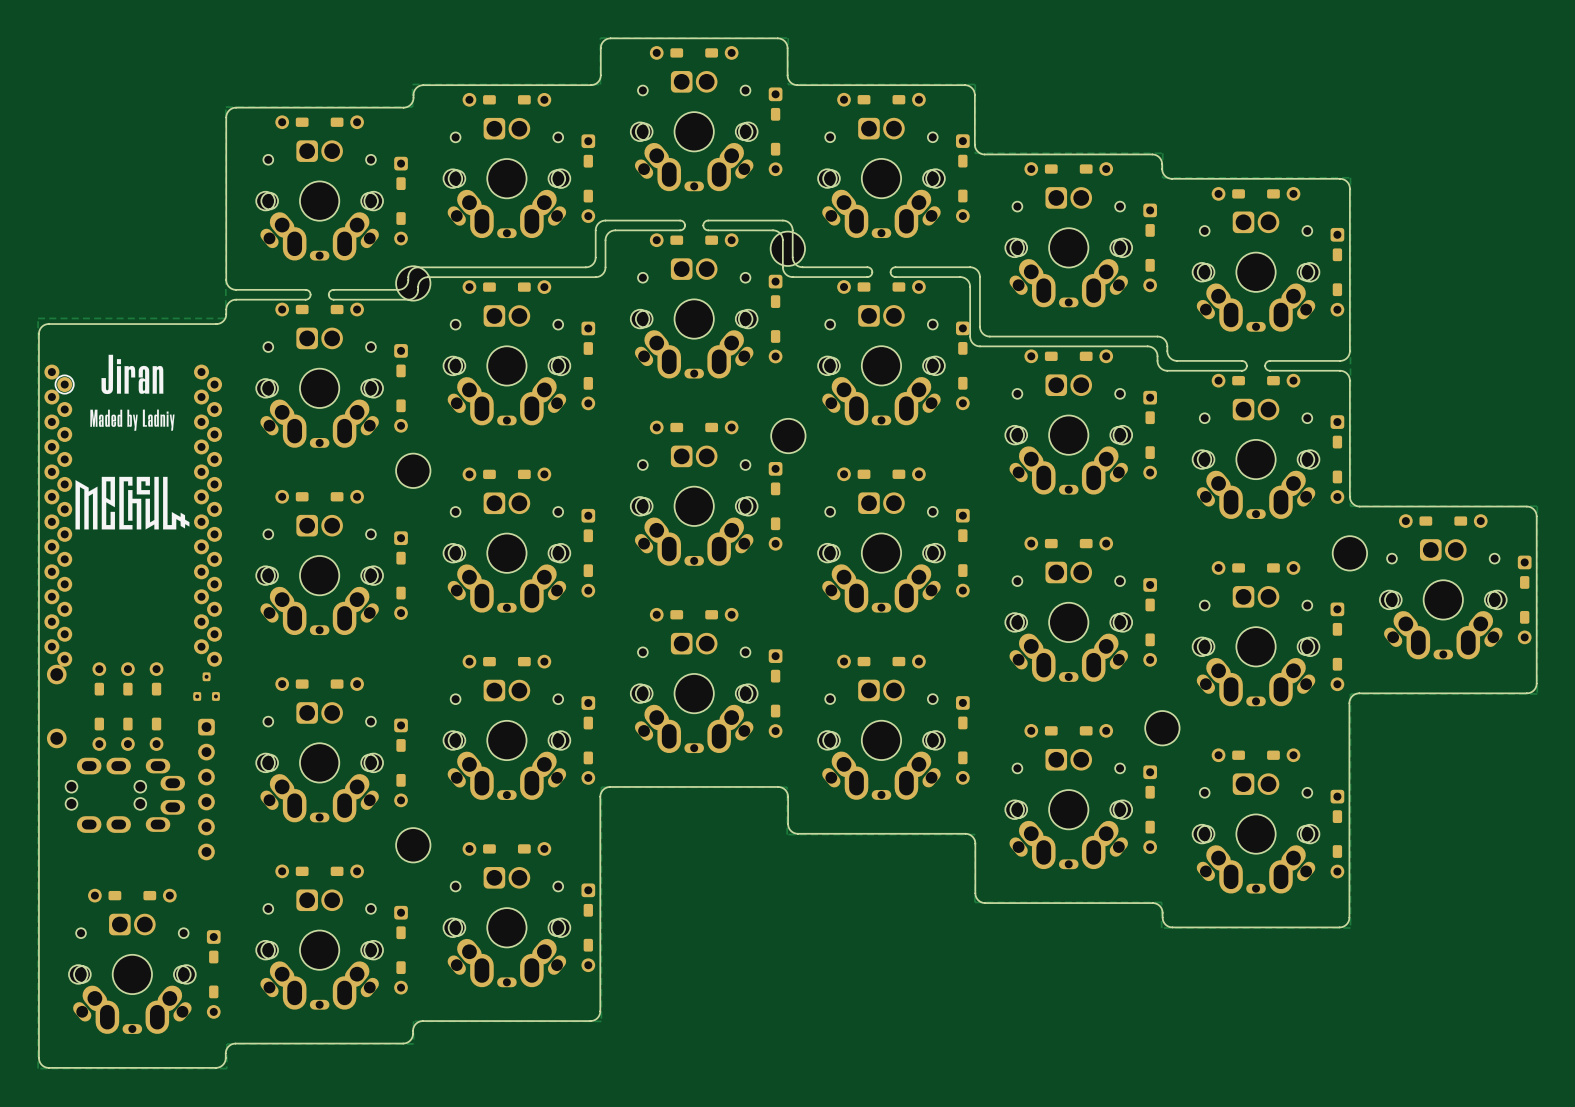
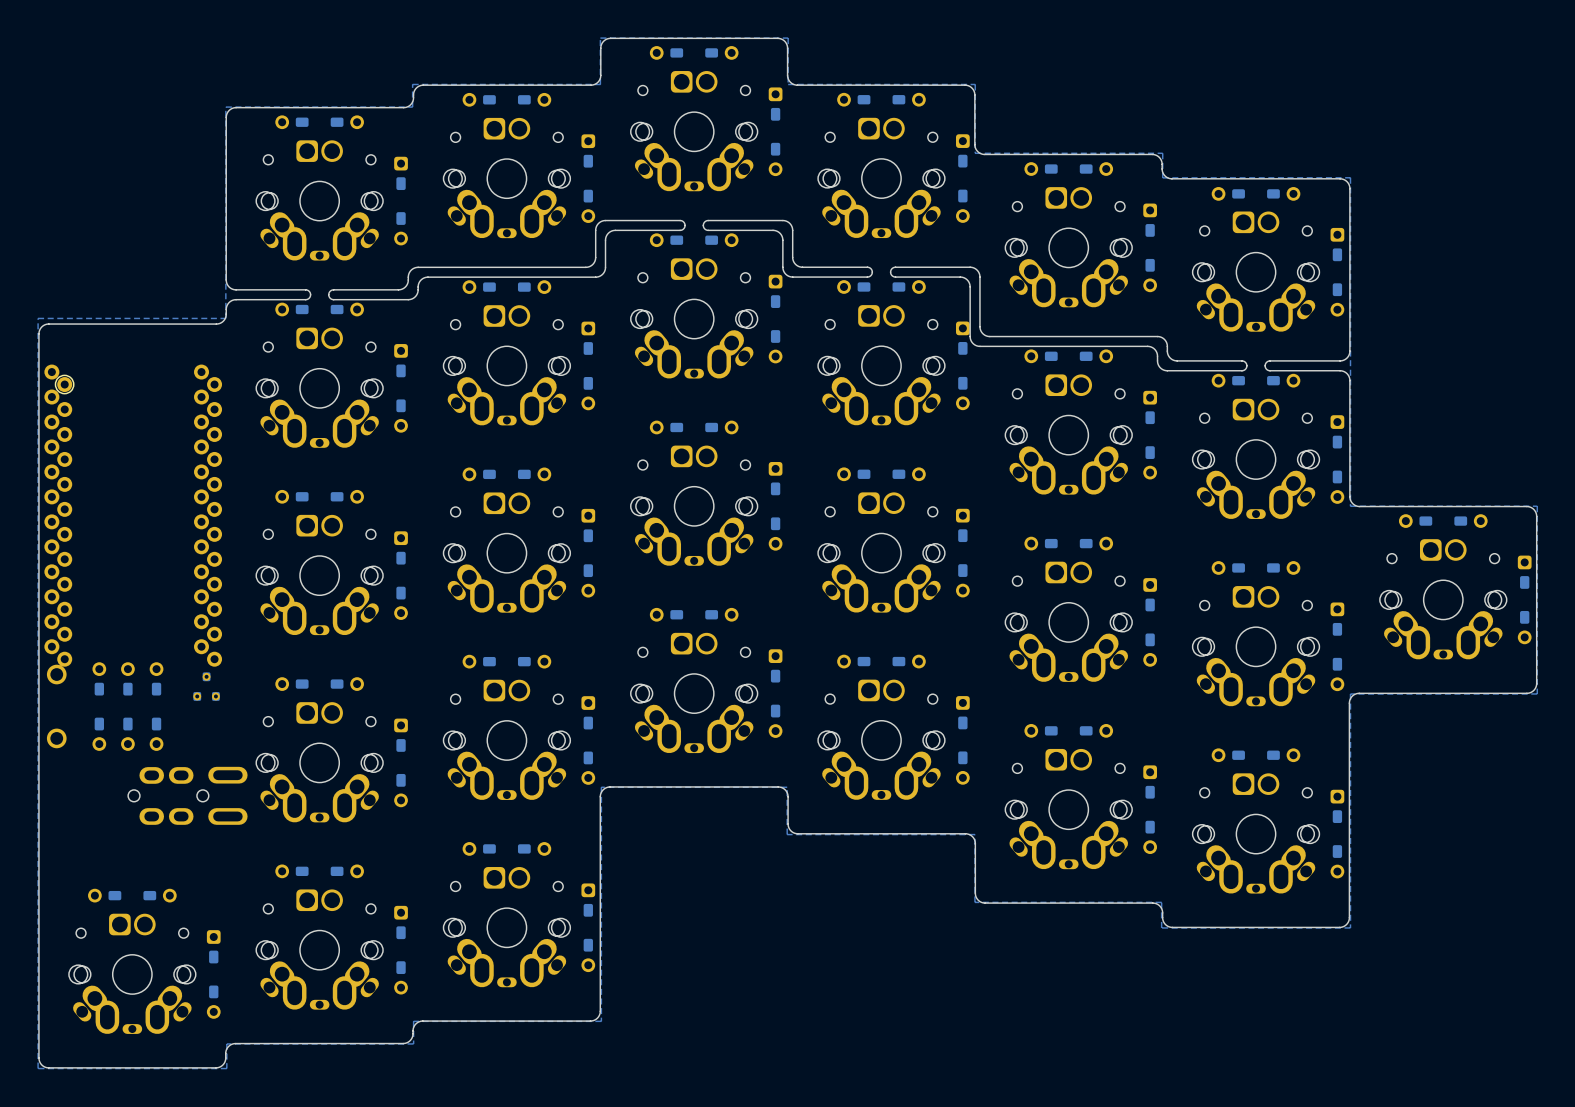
part: (787, 248) -> none
part: (413, 283) -> none
drawing: [75, 354, 190, 530] -> none
part: (788, 436) -> none
part: (413, 470) -> none
part: (1349, 553) -> none
part: (1162, 728) -> none
part: (206, 789) -> none
part: (125, 795) -> none
part: none -> (187, 795)
part: (413, 845) -> none

